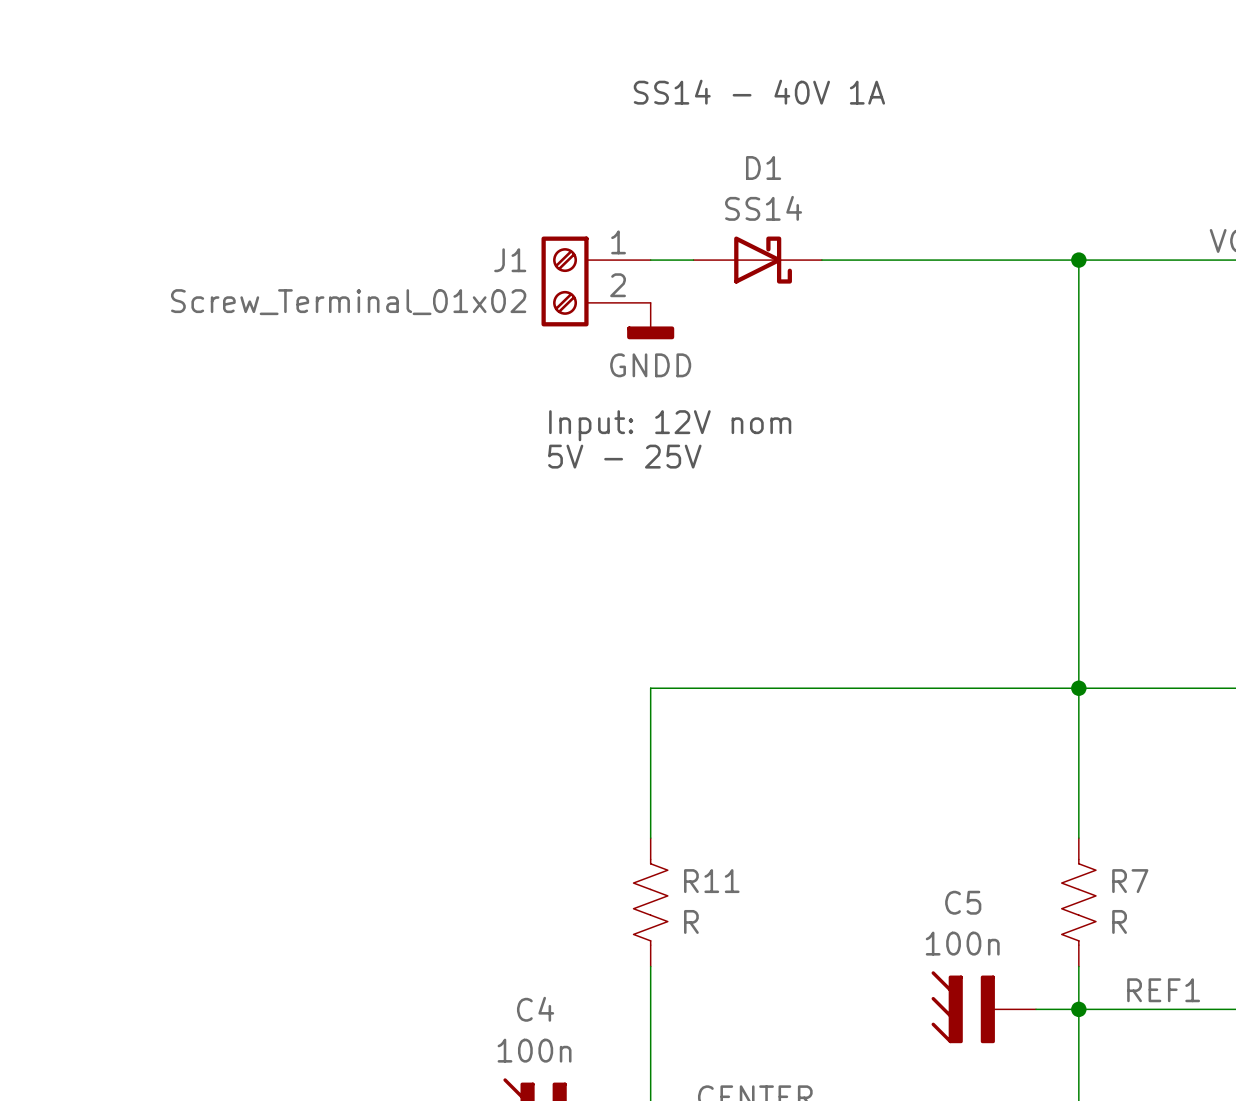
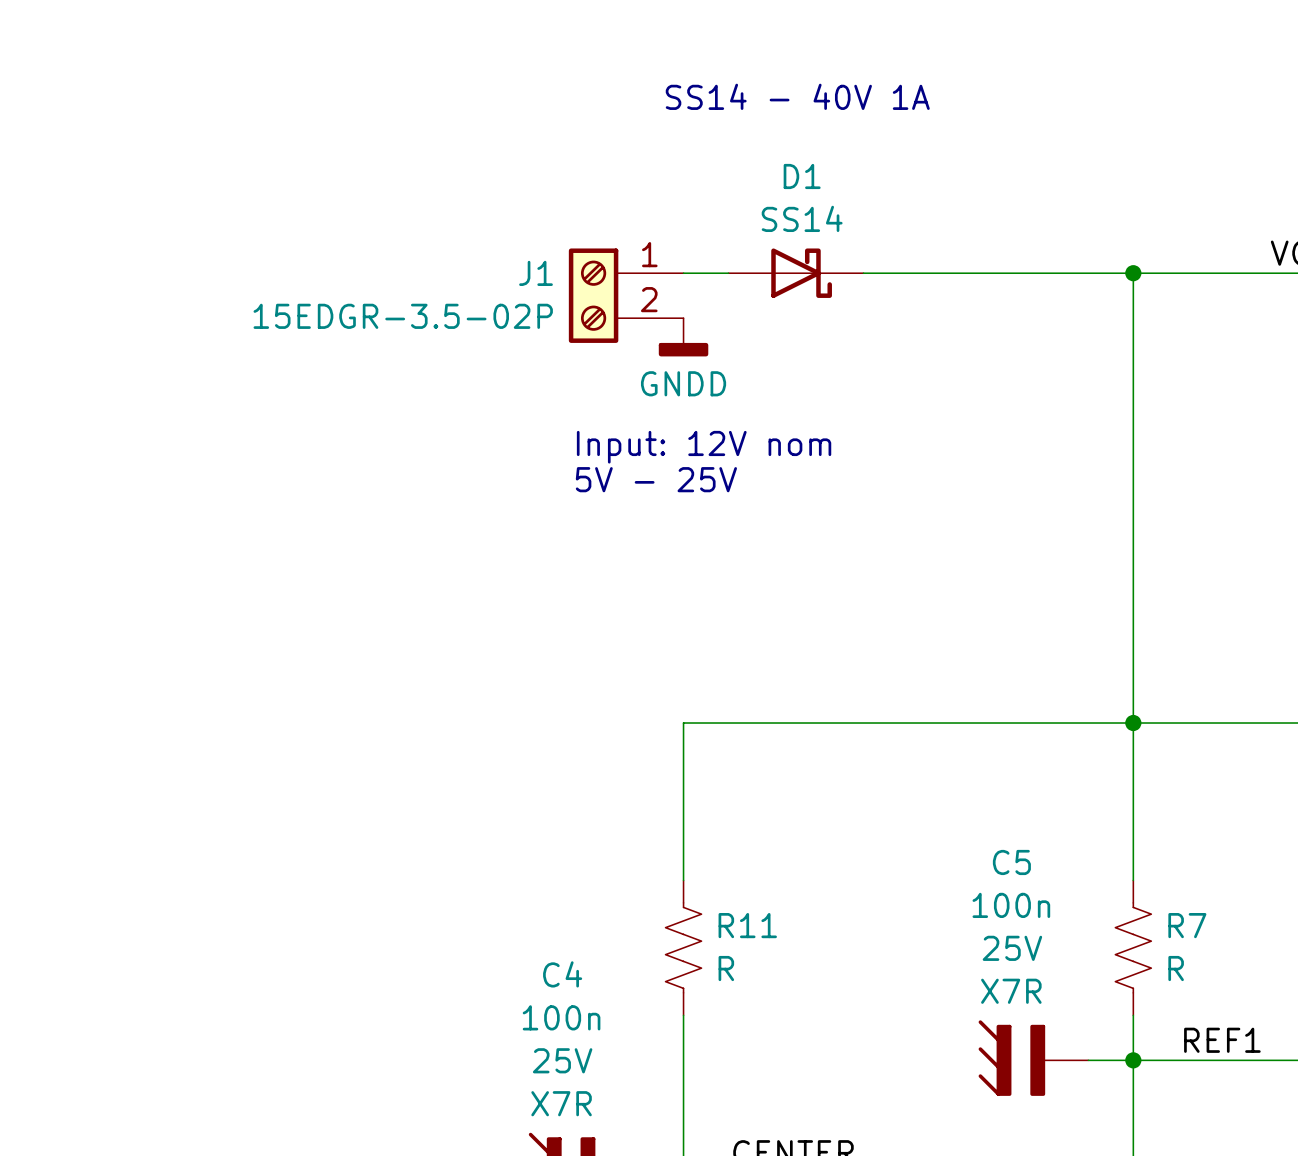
J1 value: Screw_Terminal_01x02 (348, 302) -> 15EDGR-3.5-02P (403, 316)
C5 text: none -> 25V (1012, 948)
C5 name position: C5 (963, 902) -> C5 (1011, 862)
C5 text: none -> X7R (1011, 991)
C5 value position: 100n (962, 943) -> 100n (1011, 905)
C4 text: none -> 25V (562, 1060)
C4 name position: C4 (535, 1009) -> C4 (562, 974)
C4 text: none -> X7R (561, 1103)
C4 value position: 100n (534, 1050) -> 100n (561, 1017)

